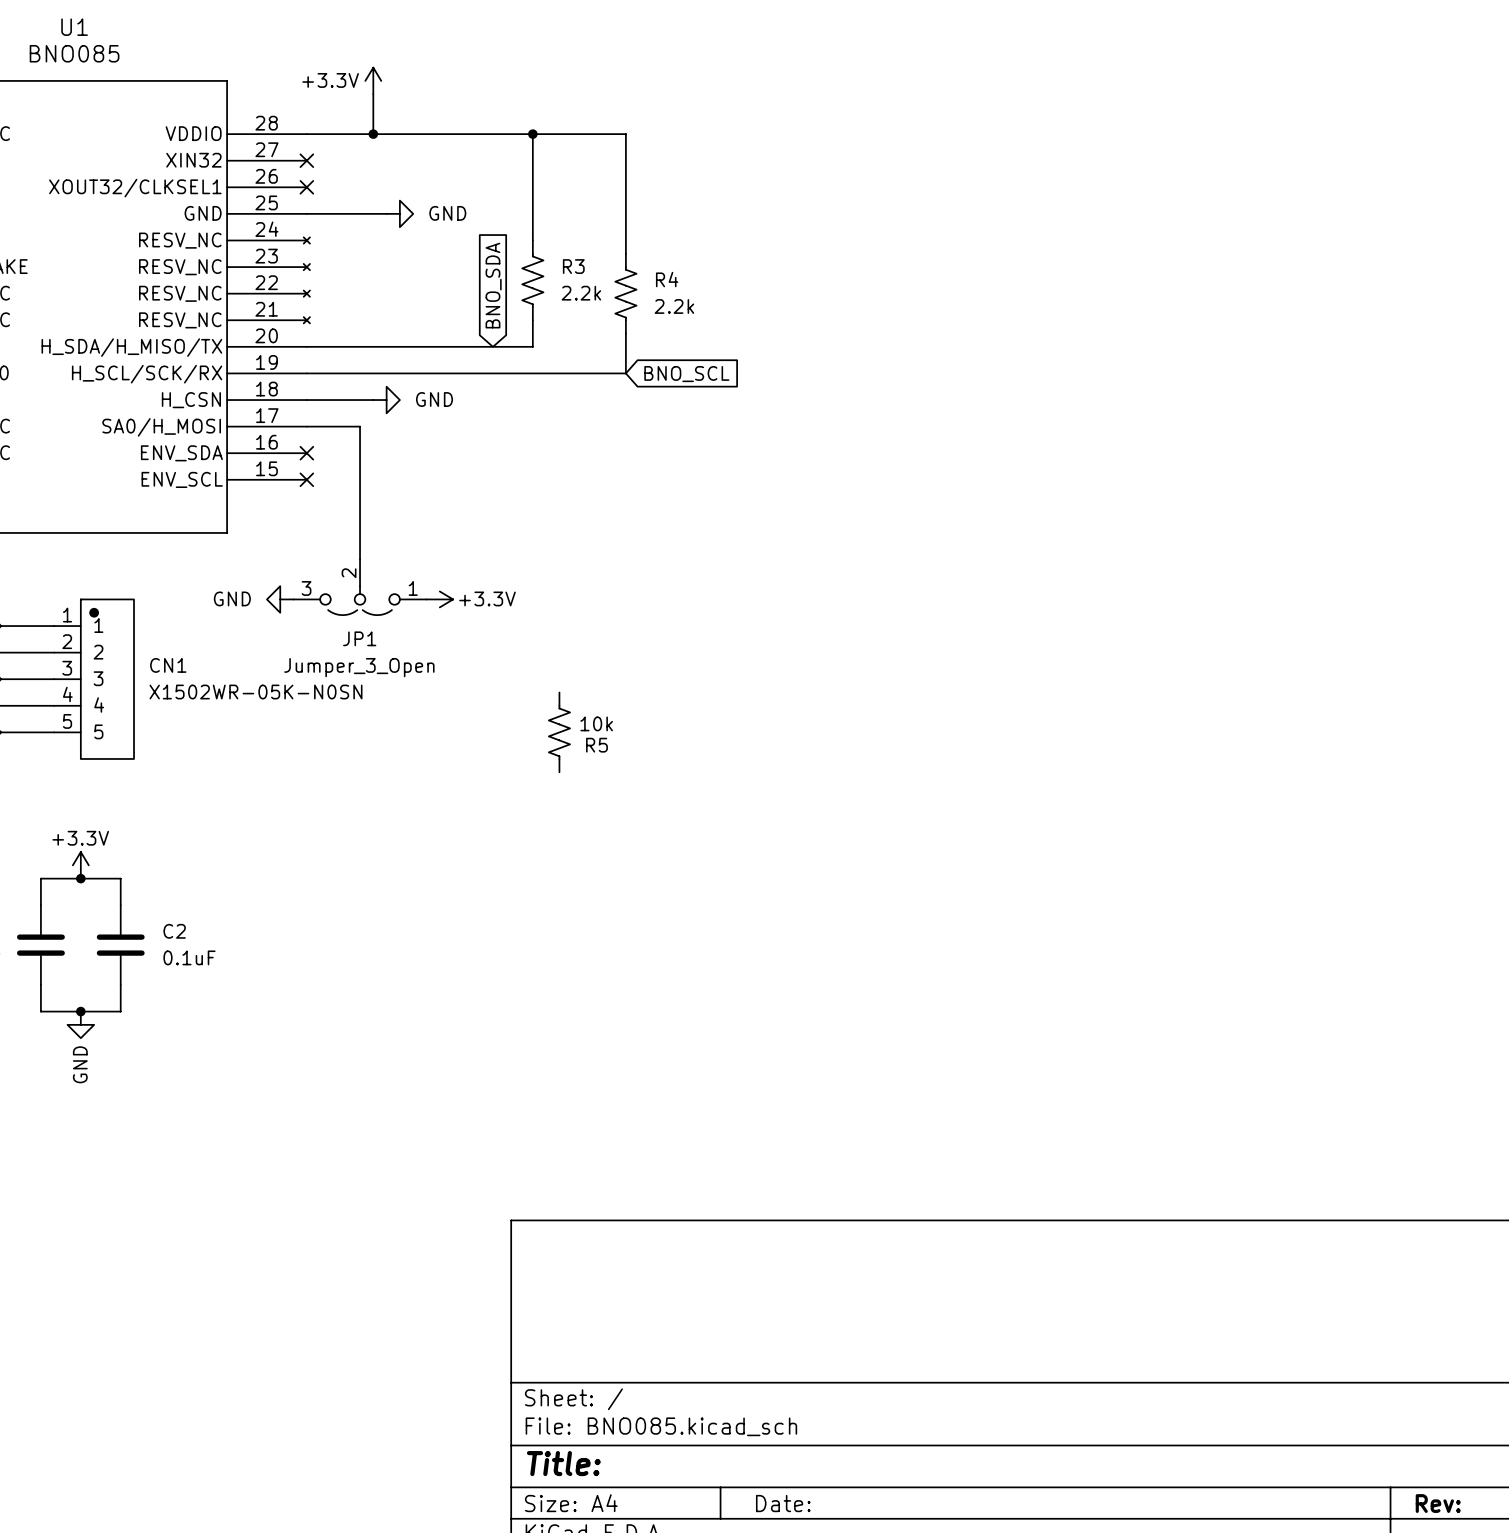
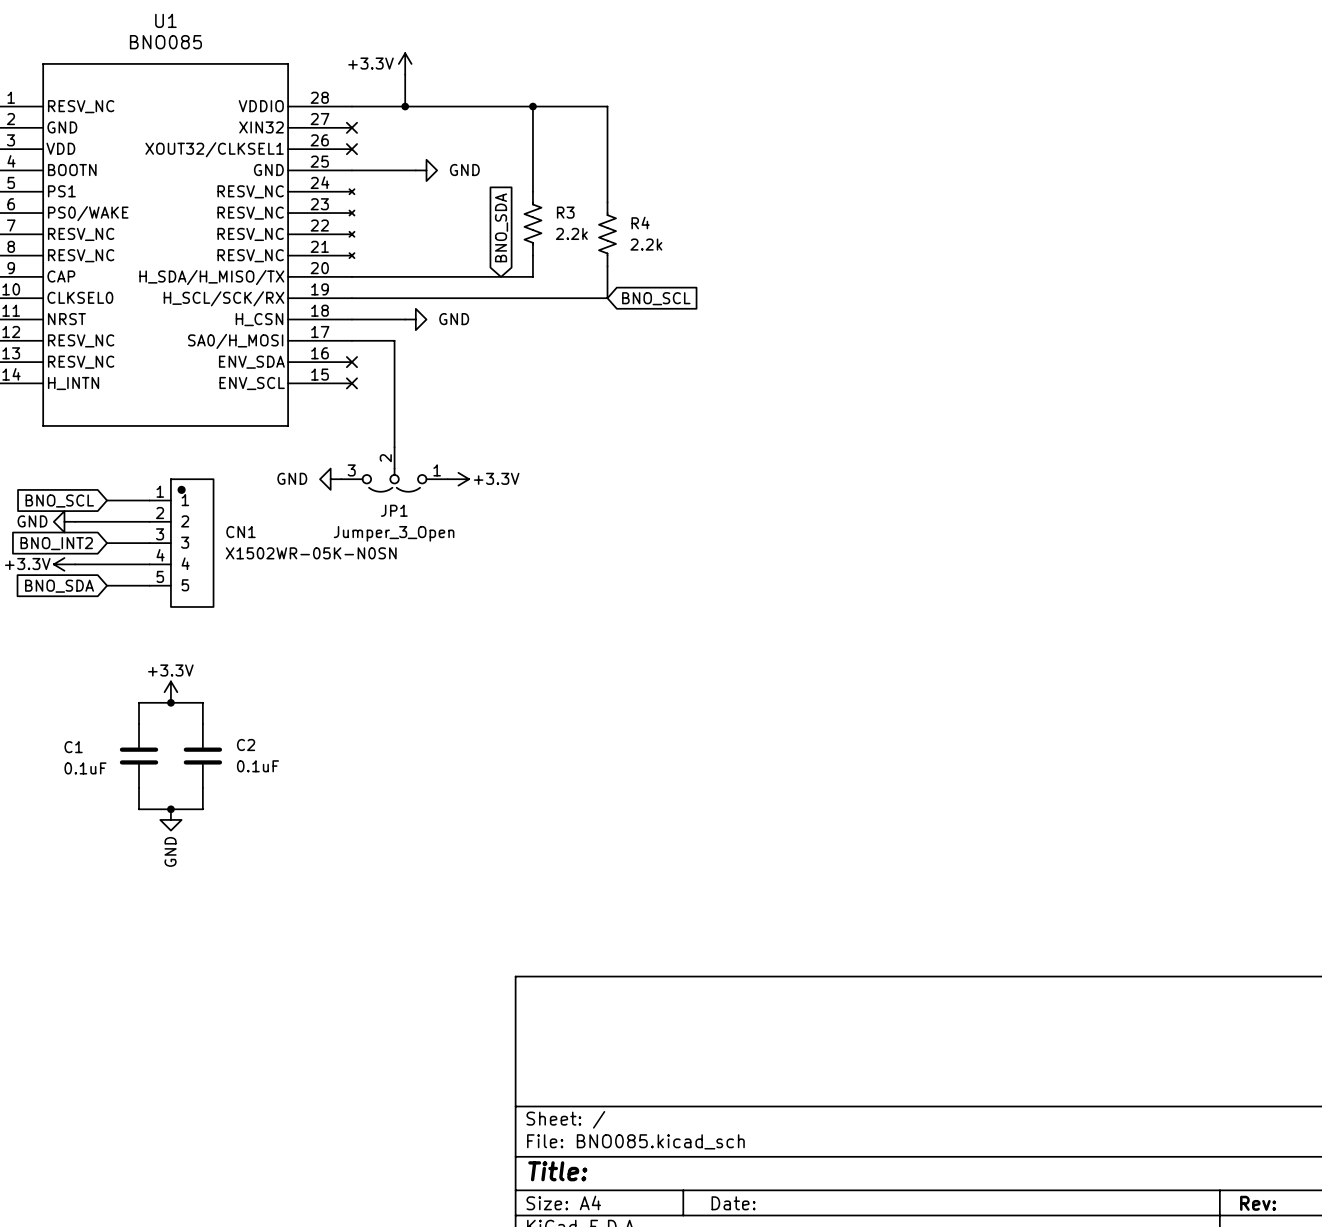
R5: 10k (559, 732) -> none

